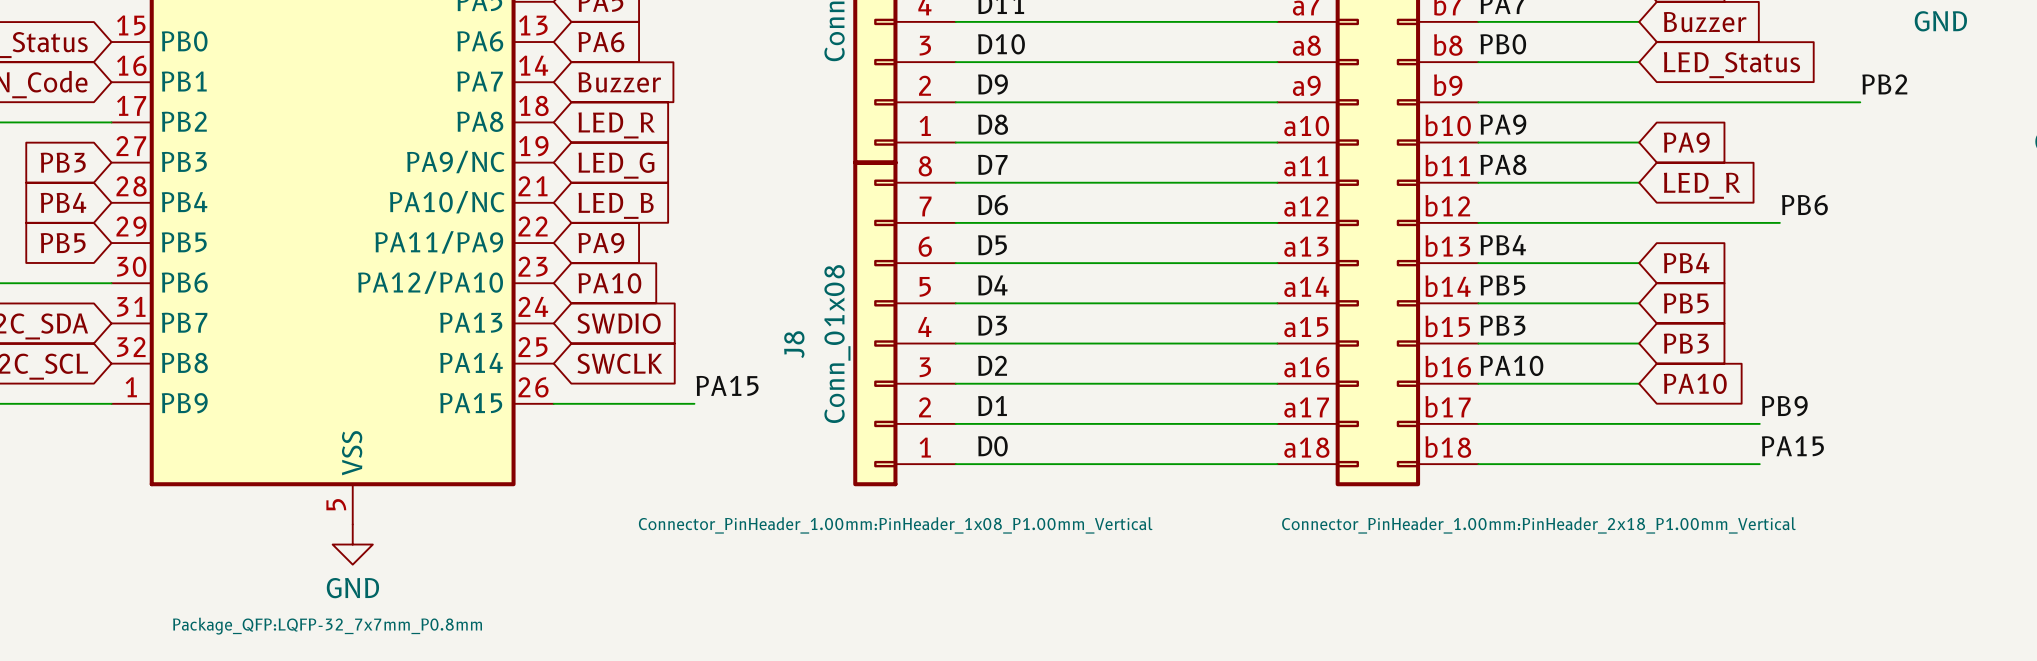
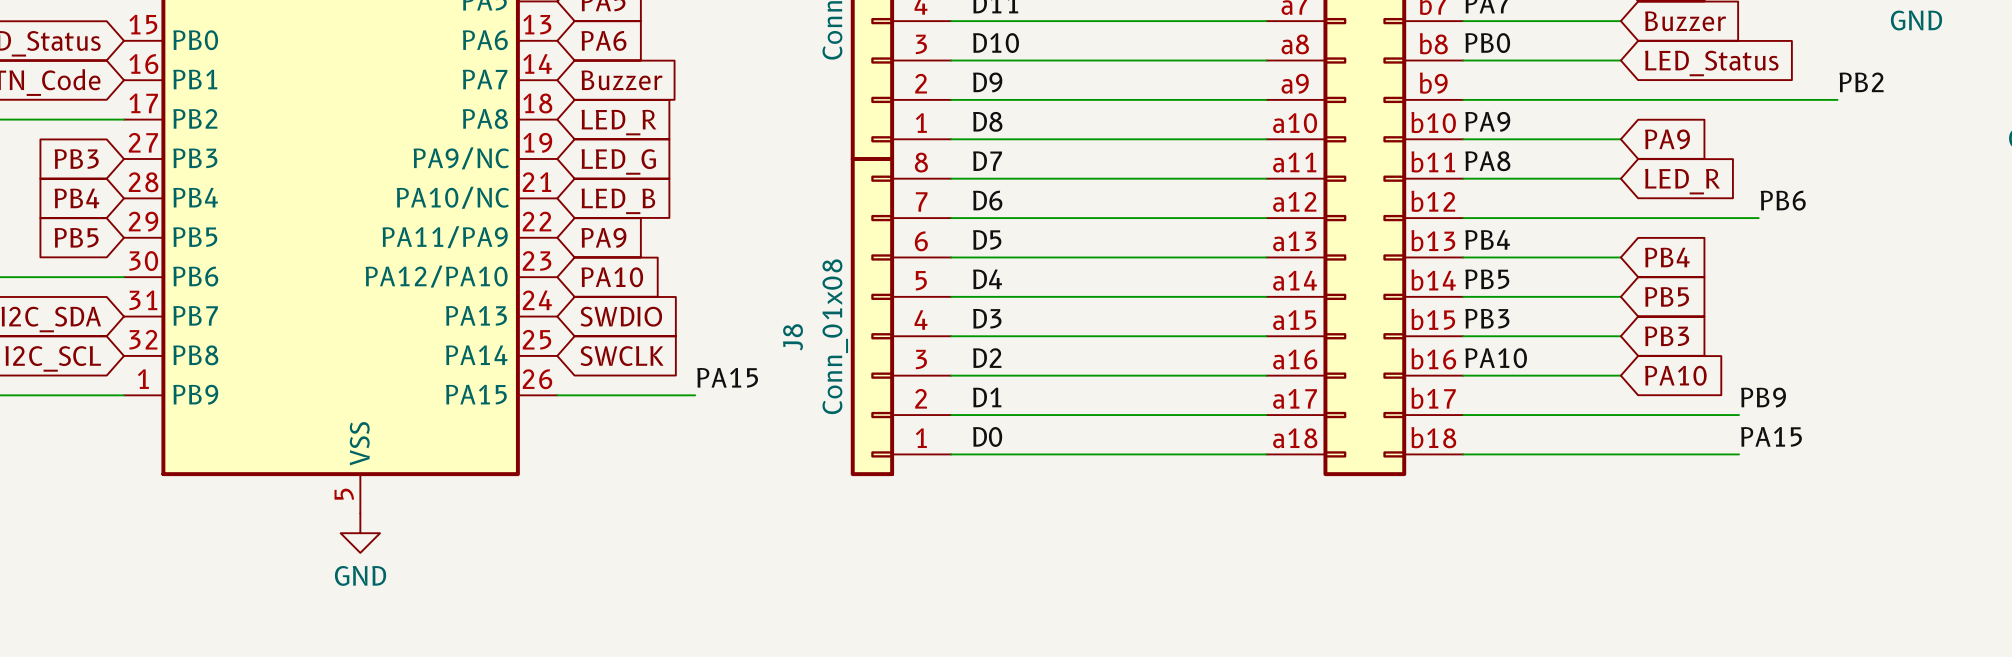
J8 text: Connector_PinHeader_1.00mm:PinHeader_1x08_P1.00mm_Vertical (895, 525) -> none
part text: Connector_PinHeader_1.00mm:PinHeader_2x18_P1.00mm_Vertical (1538, 525) -> none
part text: Package_QFP:LQFP-32_7x7mm_P0.8mm (327, 626) -> none

